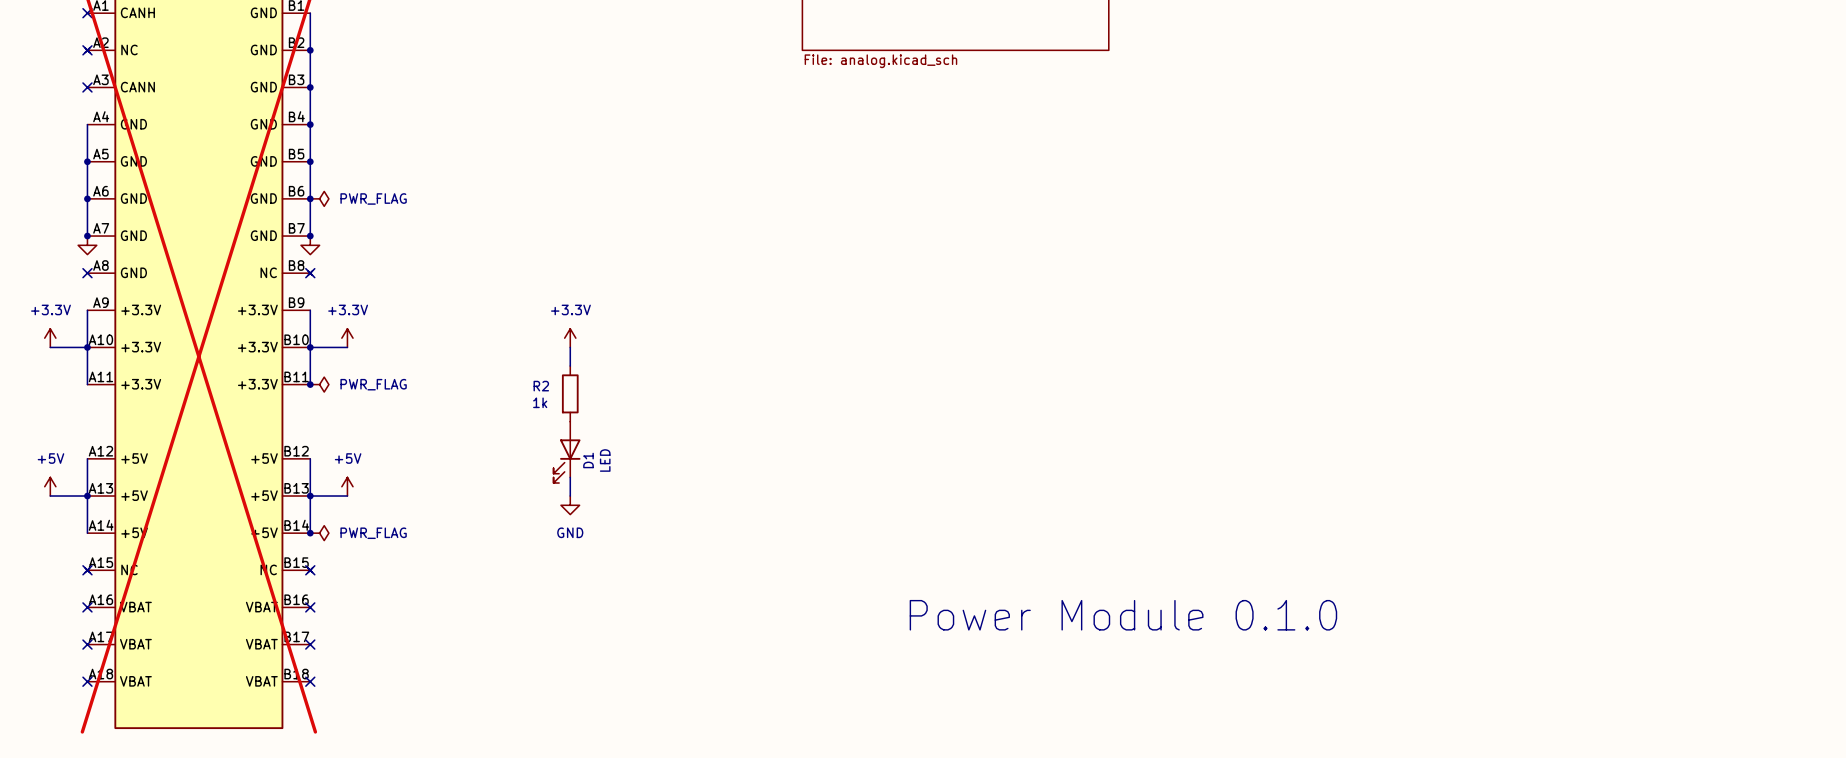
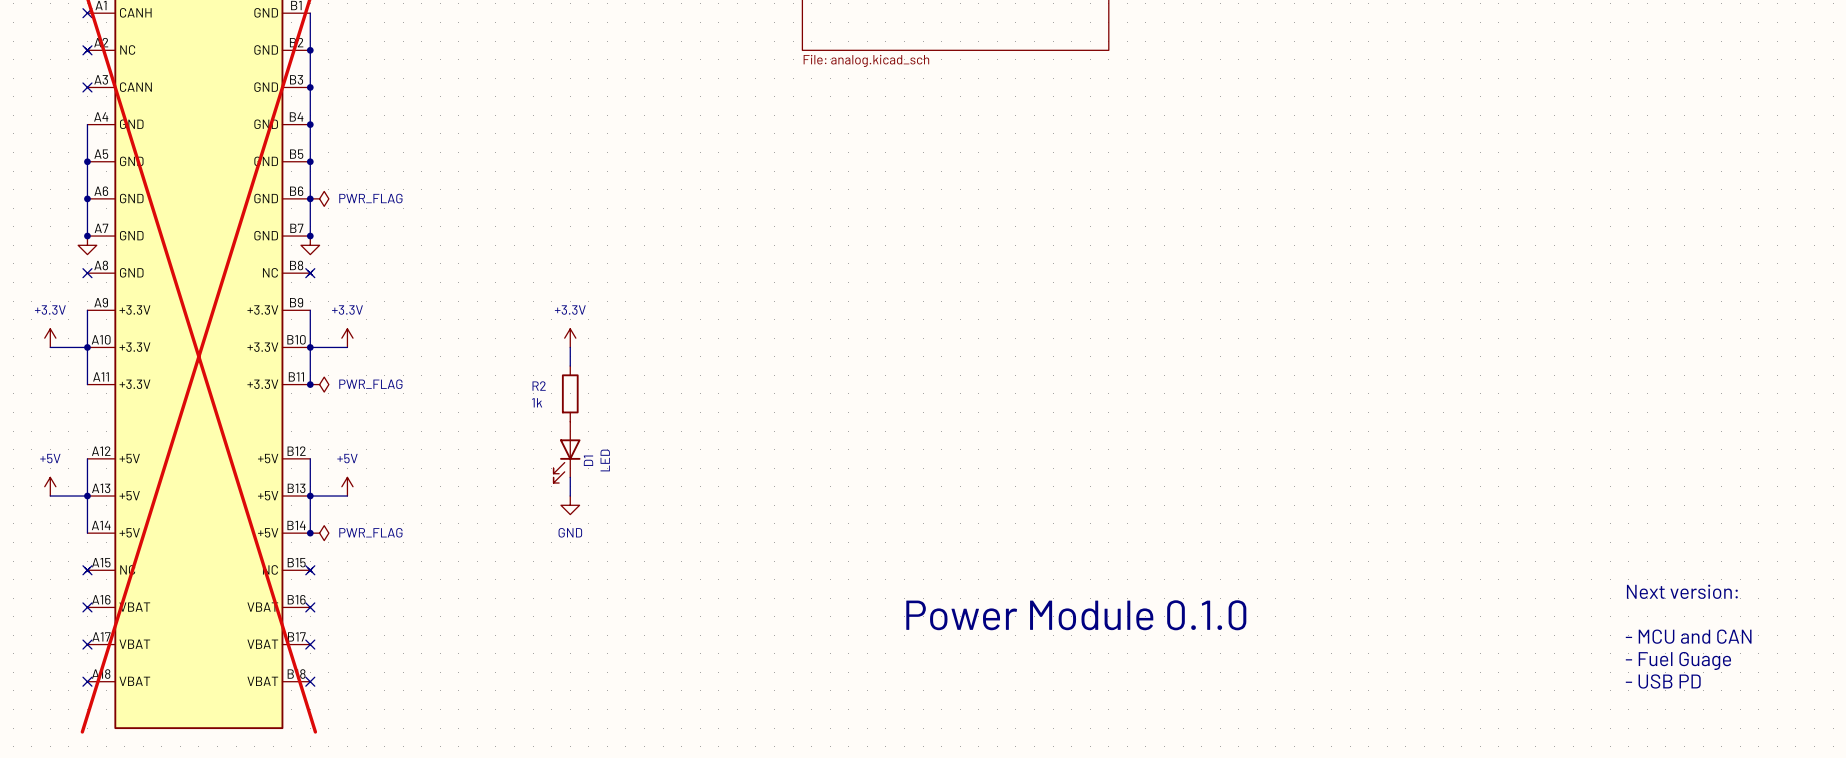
text: none -> Next version: (1682, 591)
text: none -> - MCU and CAN (1688, 636)
text: none -> - Fuel Guage (1678, 660)
text: none -> - USB PD (1663, 681)

